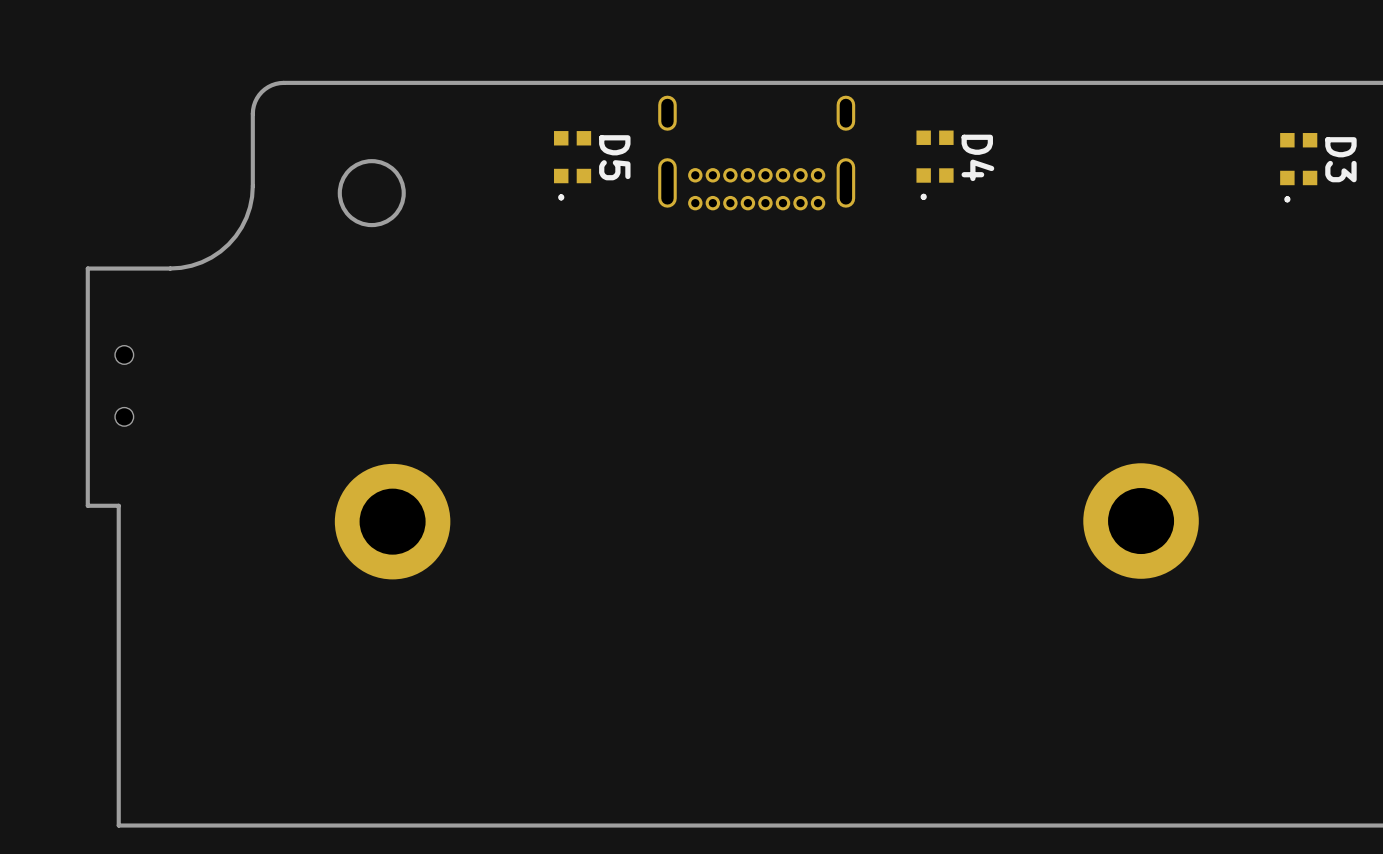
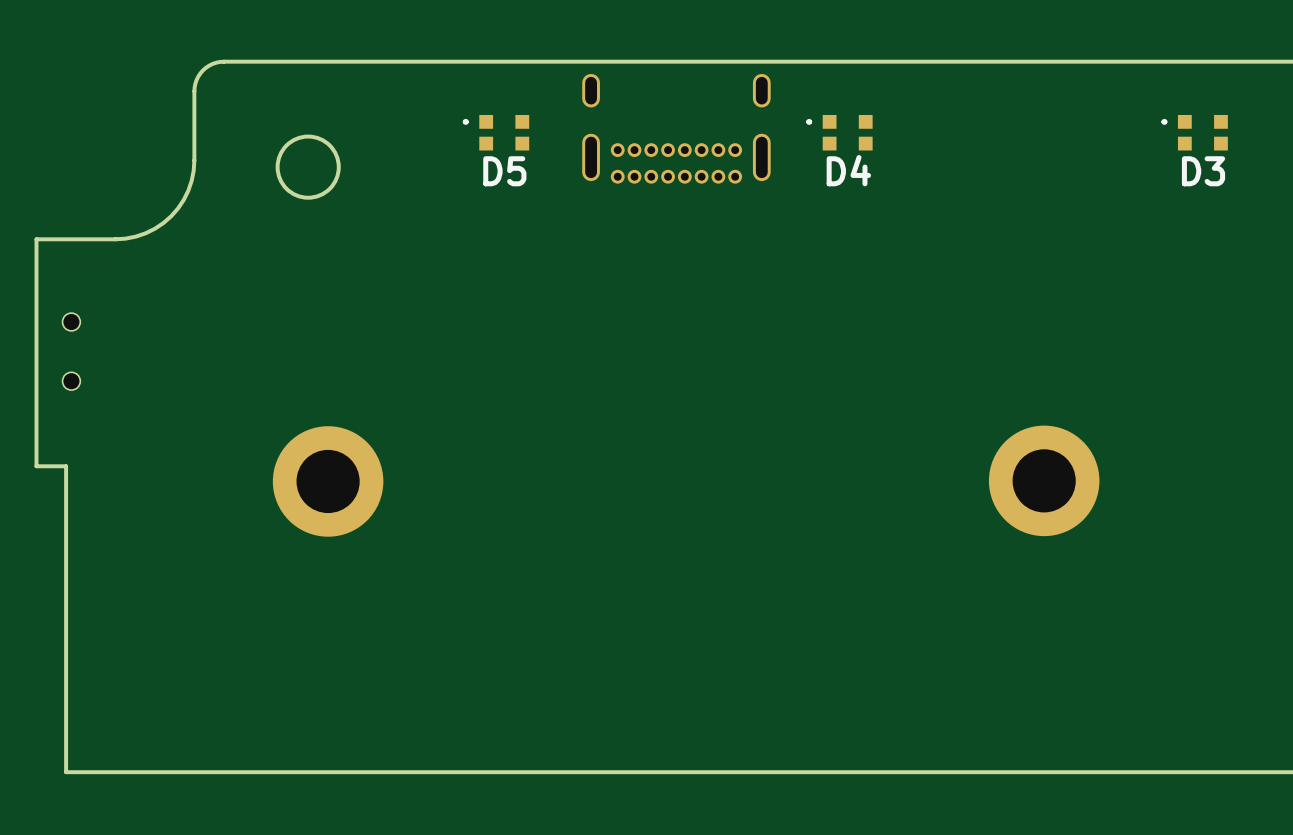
D5 rotation: 0° (572, 165) -> 90° clockwise (496, 132)
D4 rotation: 0° (935, 165) -> 90° clockwise (839, 132)
D3 rotation: 0° (1298, 167) -> 90° clockwise (1194, 132)

